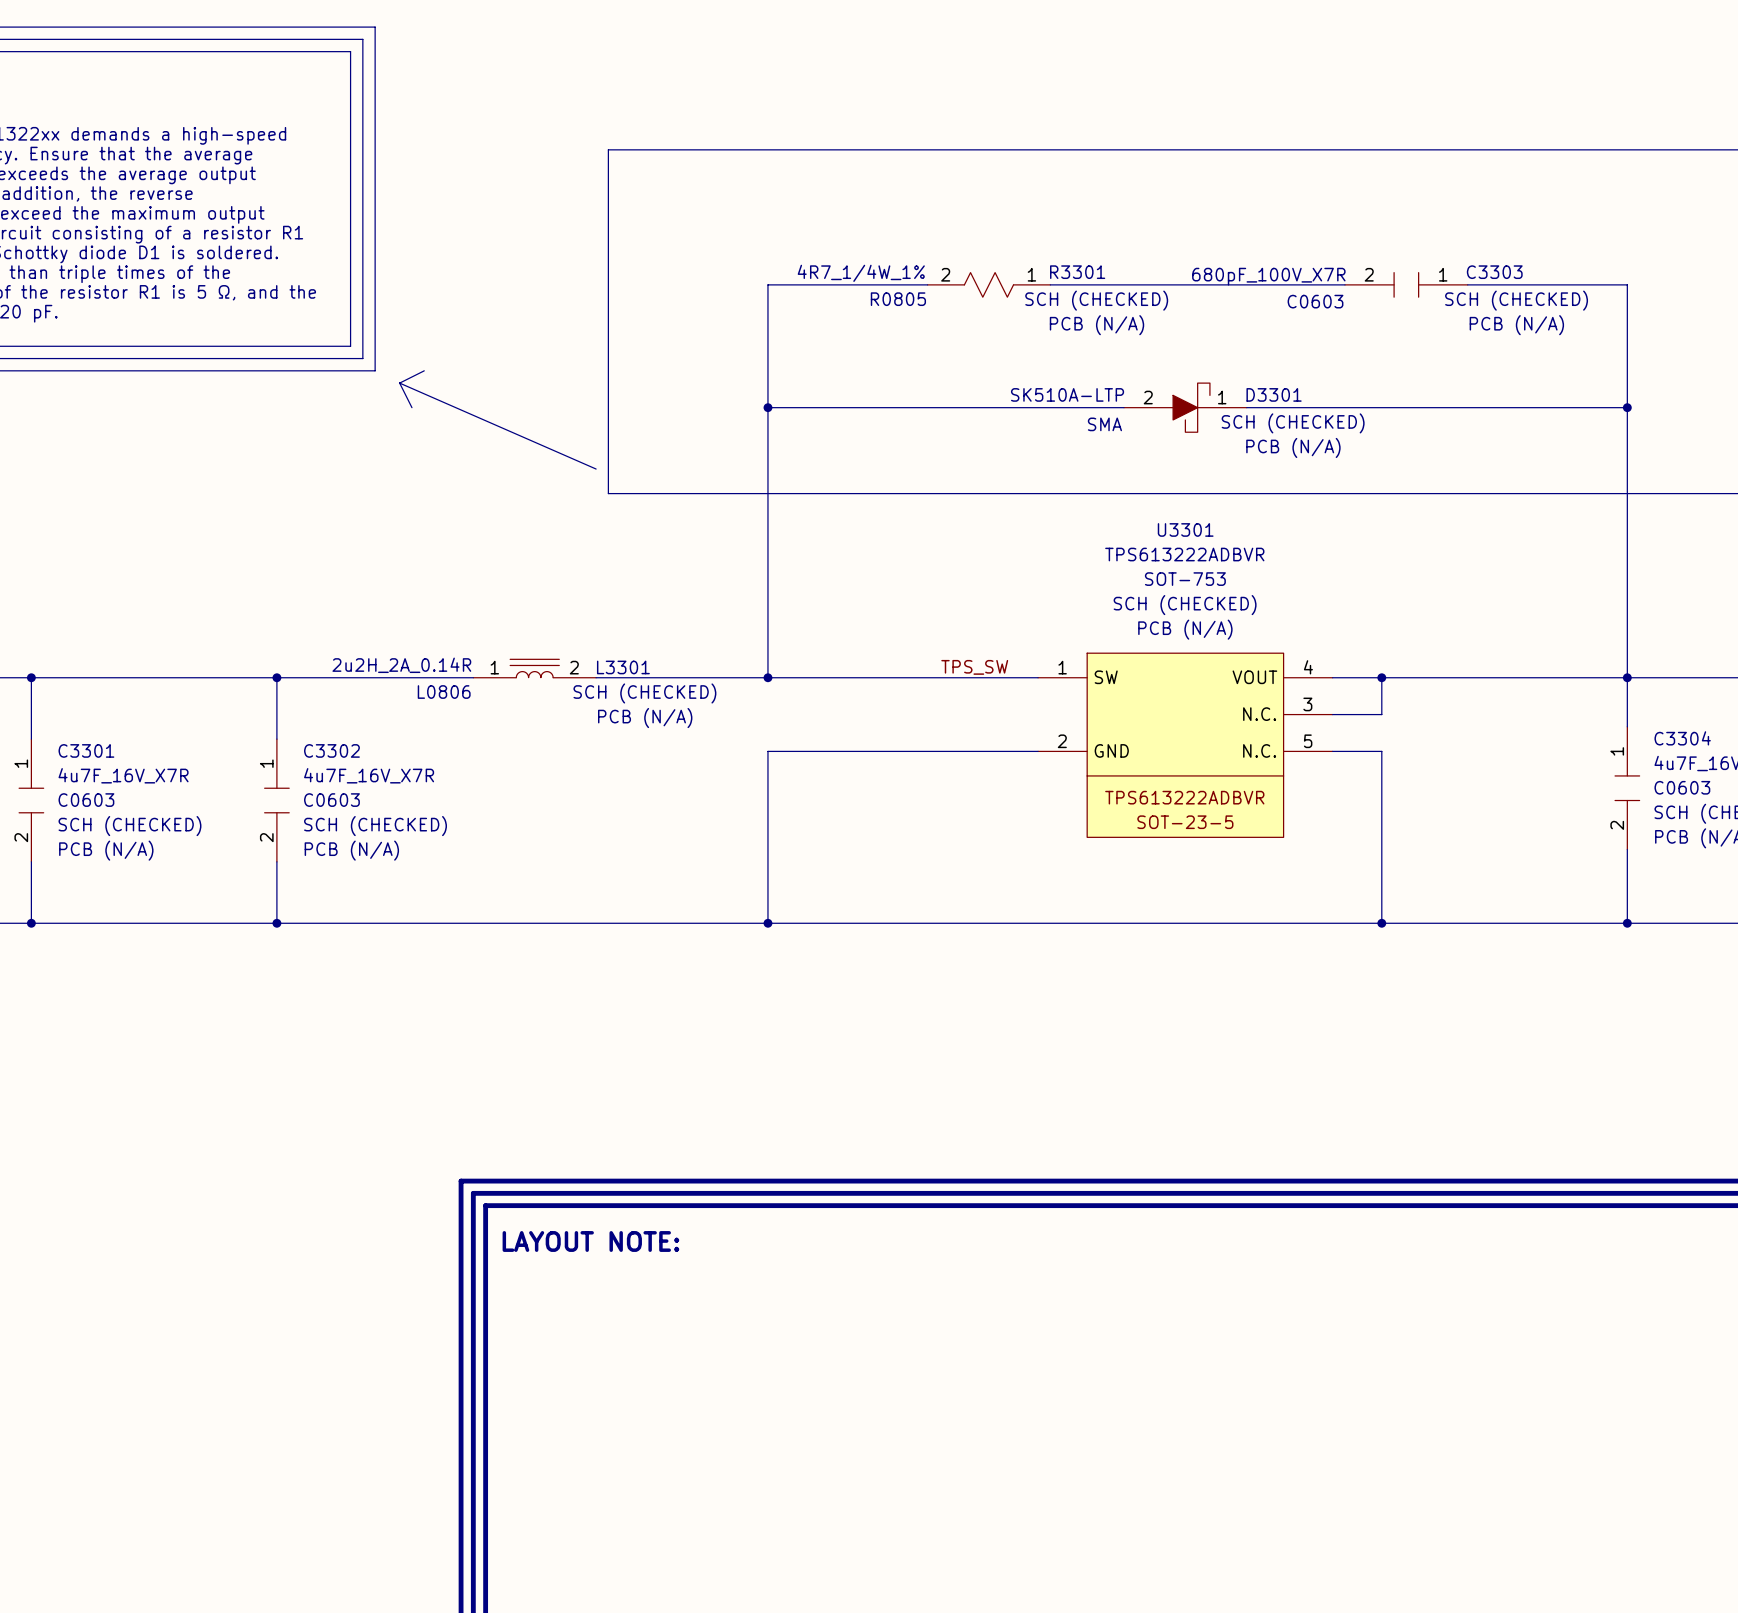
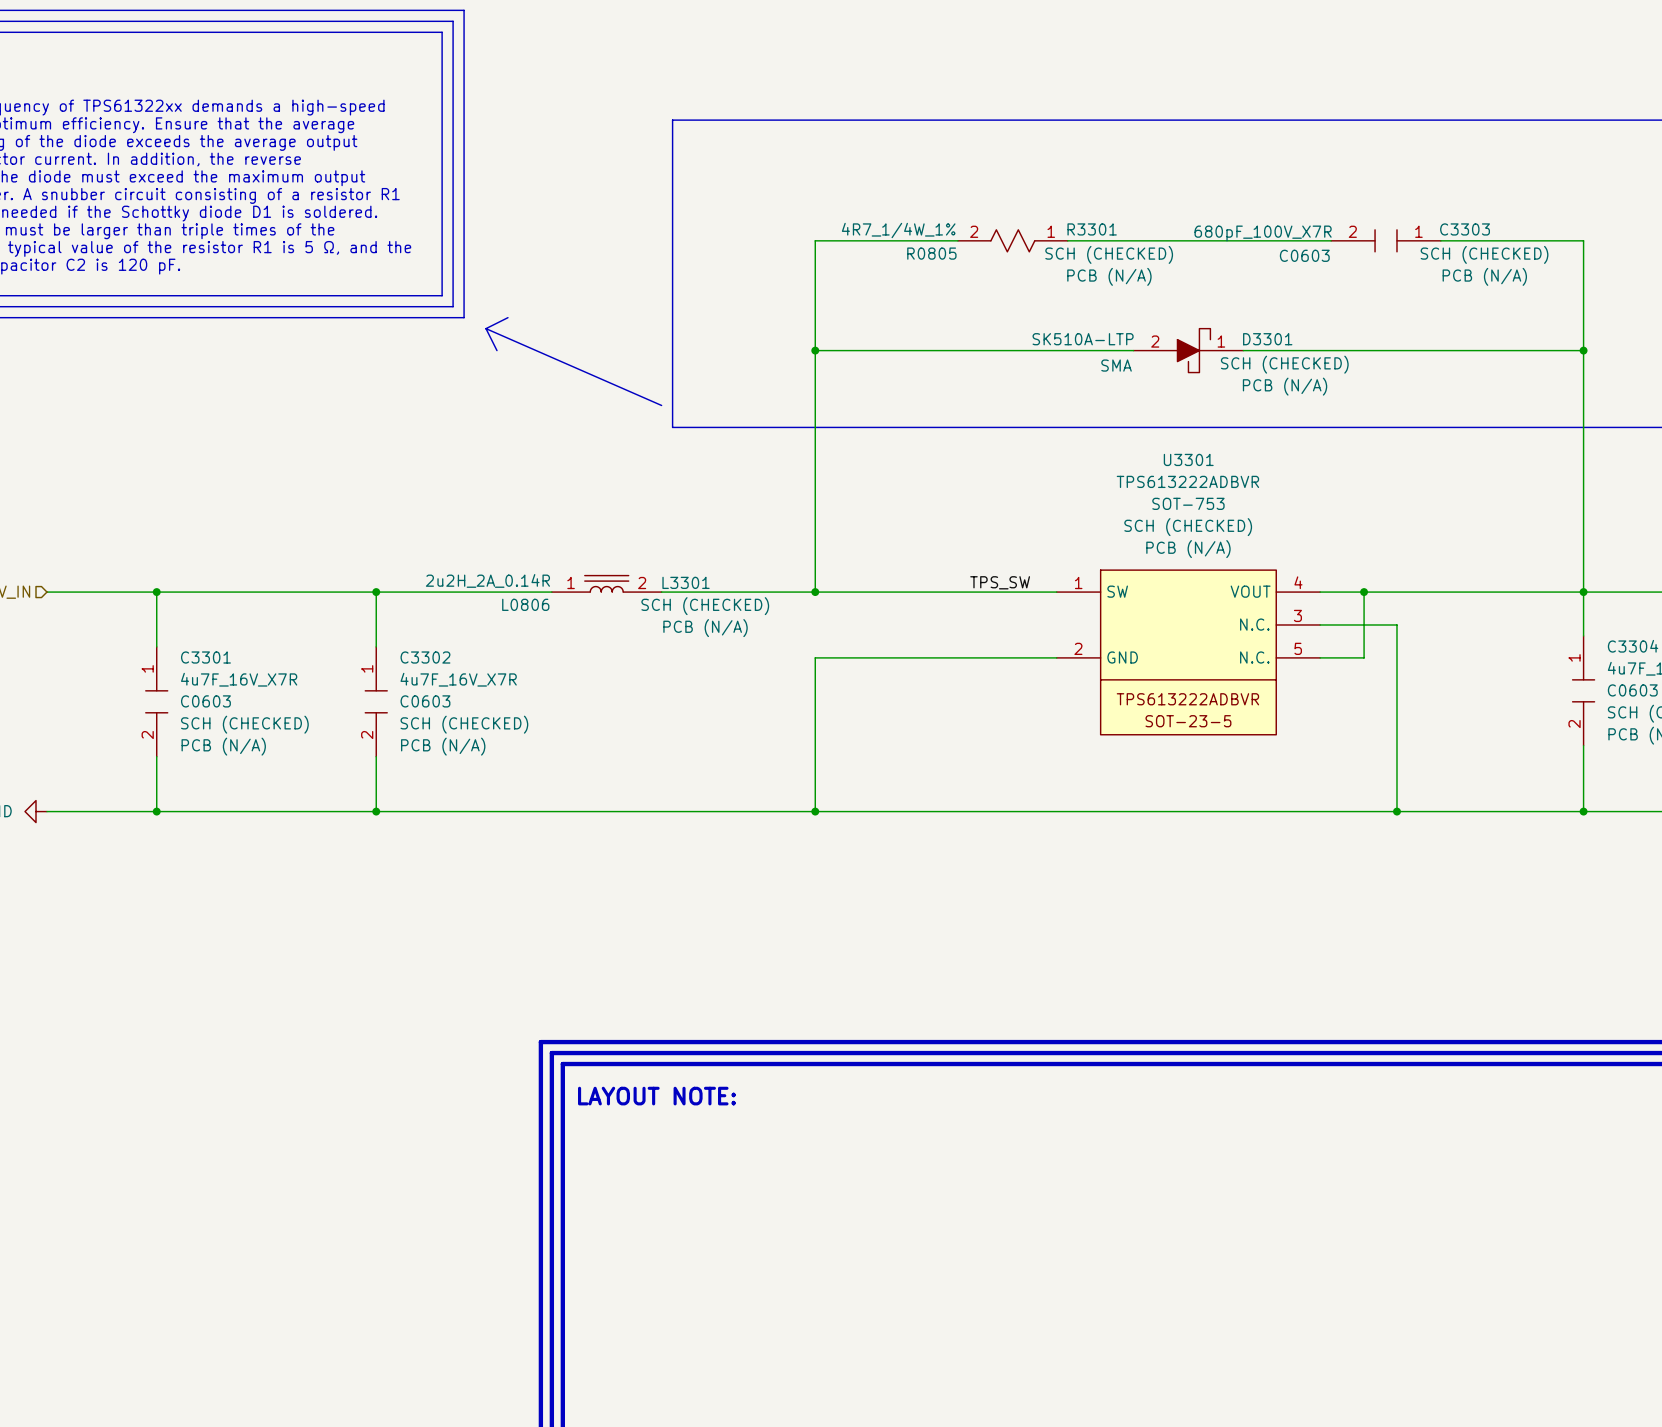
wire: (1381, 751) (1381, 923) -> (1364, 657) (1364, 624) (1396, 624) (1396, 811)
junction position: (1381, 923) -> (1396, 811)

